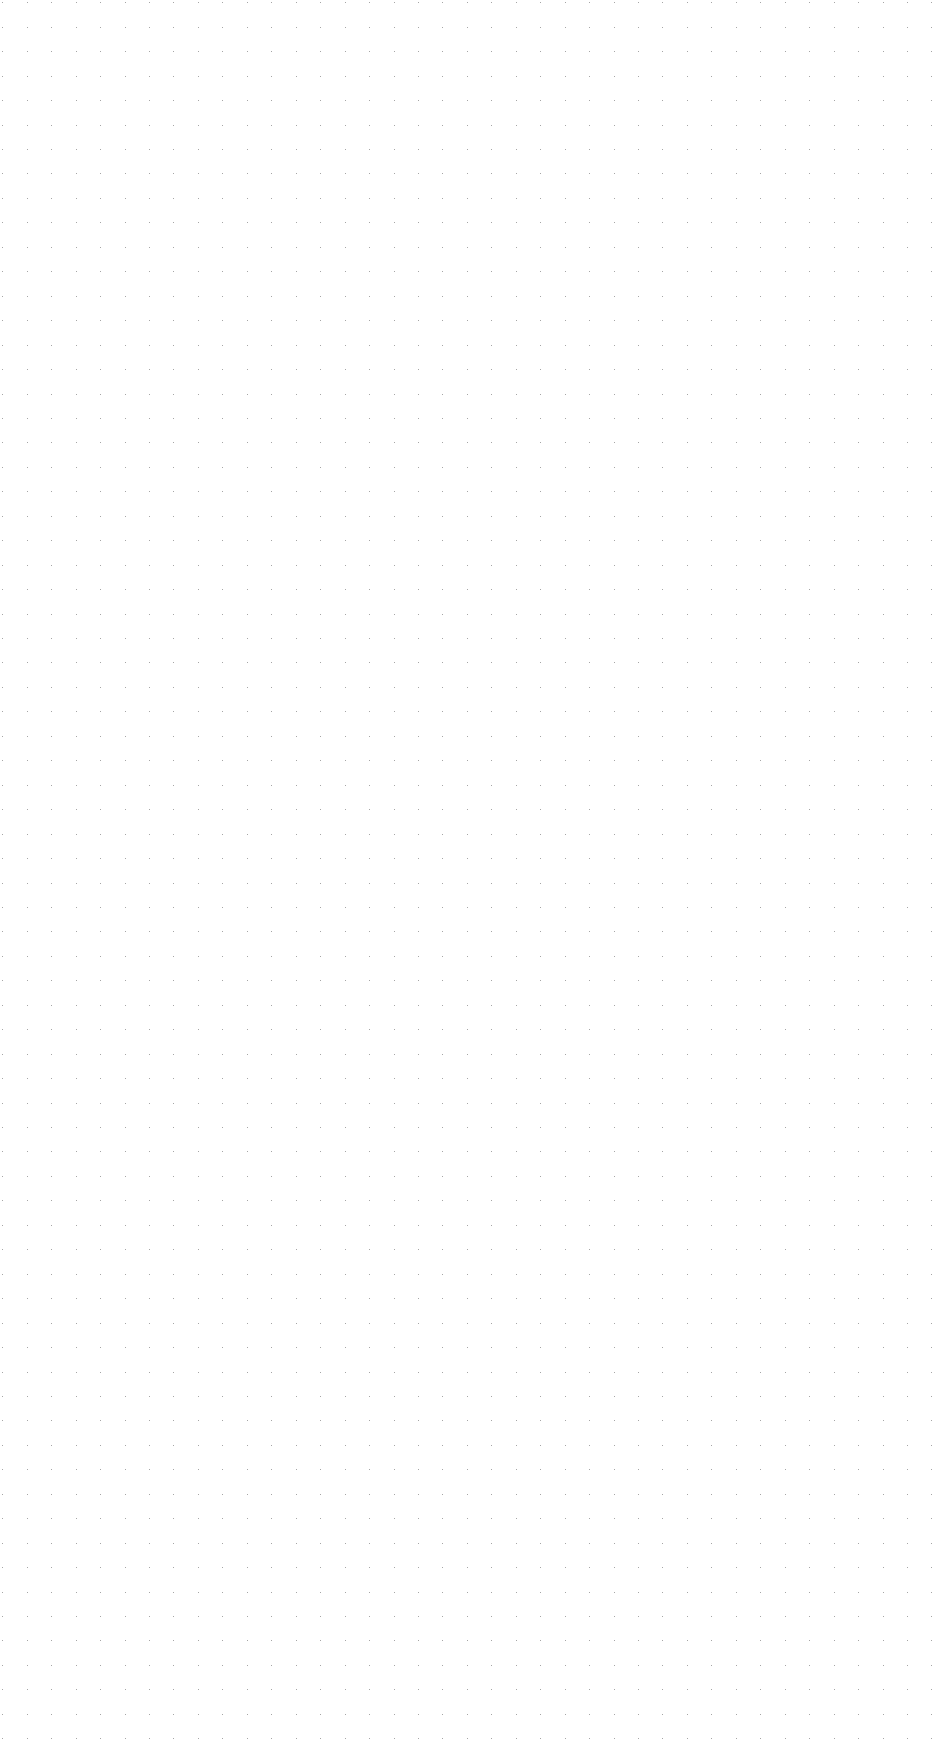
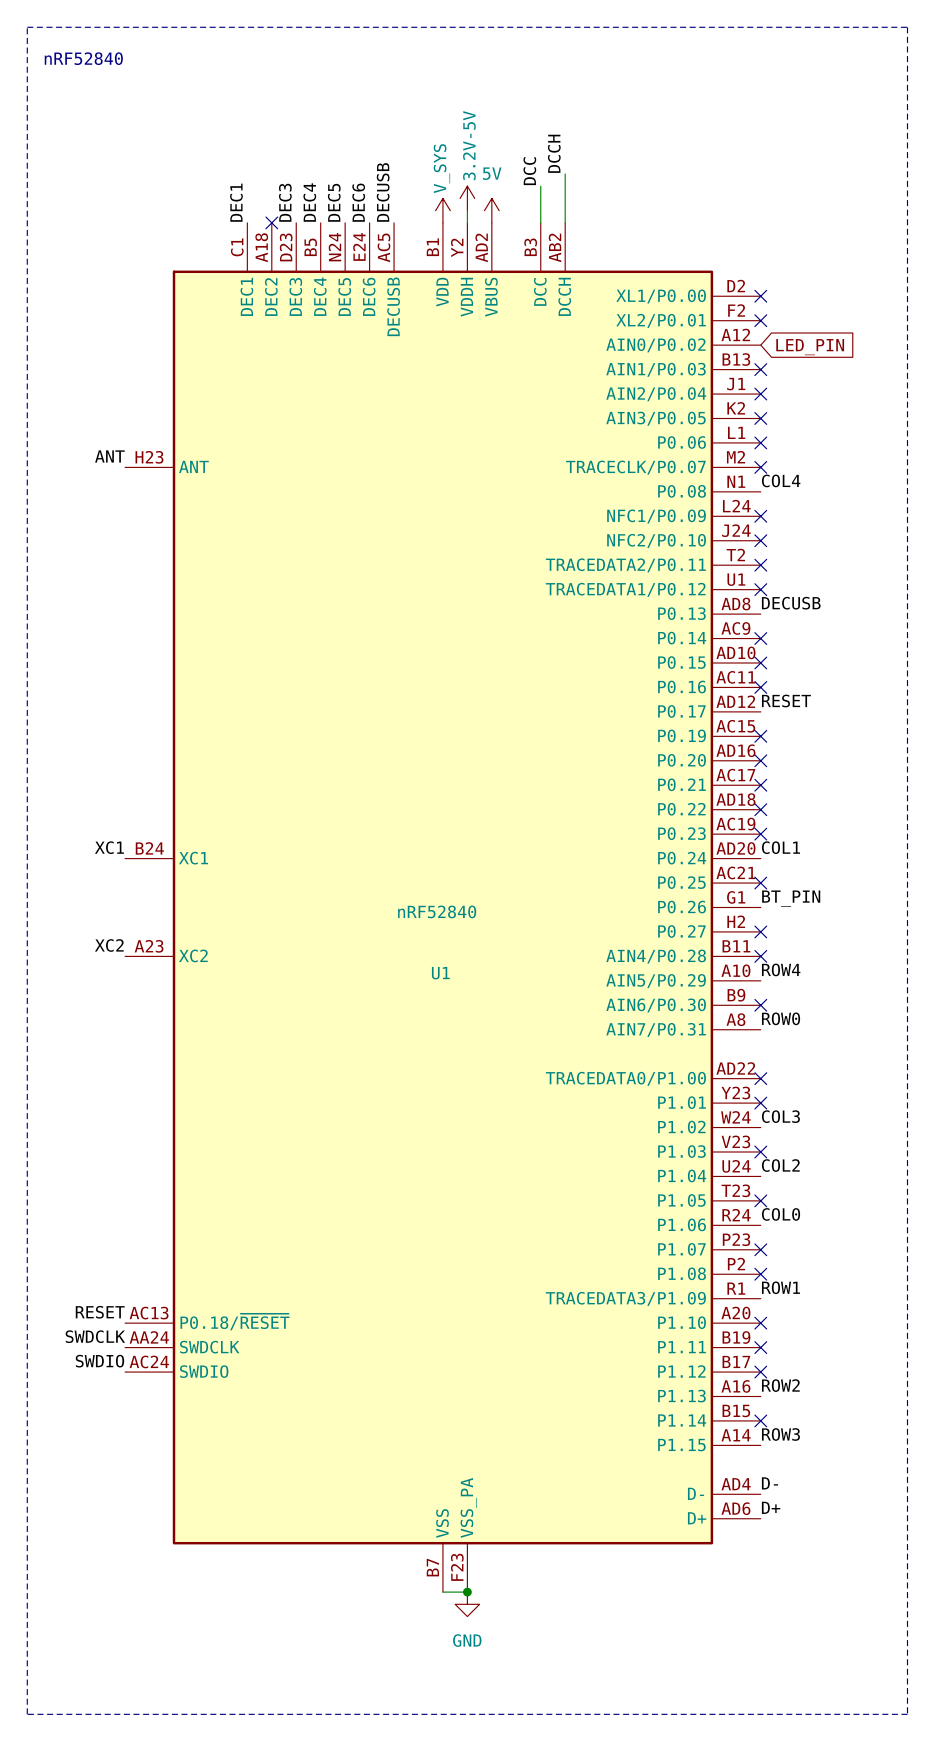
line: none -> (27, 27) (907, 27) (907, 1714) (27, 1714) (27, 27)
text: none -> nRF52840 (83, 58)
label: none -> DCCH (554, 153)
label: none -> DCC (529, 171)
wire: none -> (565, 173) (565, 222)
label: none -> DECUSB (383, 192)
wire: none -> (540, 186) (540, 222)
label: none -> DEC4 (309, 202)
label: none -> DEC1 (236, 202)
label: none -> DEC3 (285, 202)
label: none -> DEC5 (334, 202)
label: none -> DEC6 (358, 202)
power symbol: none -> 3.2V-5V (467, 198)
power symbol: none -> V_SYS (442, 210)
wire: none -> (467, 210) (467, 222)
power symbol: none -> 5V (491, 210)
no-connect mark: none -> (271, 222)
no-connect mark: none -> (760, 296)
no-connect mark: none -> (760, 320)
global label: none -> LED_PIN (810, 347)
no-connect mark: none -> (760, 369)
no-connect mark: none -> (760, 394)
no-connect mark: none -> (760, 418)
no-connect mark: none -> (760, 442)
label: none -> ANT (109, 456)
no-connect mark: none -> (760, 467)
label: none -> COL4 (781, 480)
no-connect mark: none -> (760, 516)
no-connect mark: none -> (760, 540)
no-connect mark: none -> (760, 565)
no-connect mark: none -> (760, 589)
label: none -> DECUSB (791, 603)
no-connect mark: none -> (760, 638)
no-connect mark: none -> (760, 662)
no-connect mark: none -> (760, 687)
label: none -> RESET (786, 700)
no-connect mark: none -> (760, 736)
no-connect mark: none -> (760, 760)
no-connect mark: none -> (760, 785)
no-connect mark: none -> (760, 809)
no-connect mark: none -> (760, 834)
label: none -> XC1 (109, 847)
label: none -> COL1 (780, 847)
no-connect mark: none -> (760, 883)
label: none -> BT_PIN (791, 898)
U1: none -> nRF52840 (442, 907)
no-connect mark: none -> (760, 931)
label: none -> XC2 (109, 945)
no-connect mark: none -> (760, 956)
label: none -> ROW4 (781, 969)
no-connect mark: none -> (760, 1005)
label: none -> ROW0 (781, 1018)
no-connect mark: none -> (760, 1078)
no-connect mark: none -> (760, 1103)
label: none -> COL3 (780, 1116)
no-connect mark: none -> (760, 1151)
label: none -> COL2 (780, 1165)
no-connect mark: none -> (760, 1200)
label: none -> COL0 (781, 1214)
no-connect mark: none -> (760, 1249)
no-connect mark: none -> (760, 1274)
label: none -> ROW1 (781, 1287)
label: none -> RESET (100, 1312)
no-connect mark: none -> (760, 1323)
label: none -> SWDCLK (95, 1336)
no-connect mark: none -> (760, 1347)
label: none -> SWDIO (99, 1361)
no-connect mark: none -> (760, 1372)
label: none -> ROW2 (780, 1385)
no-connect mark: none -> (760, 1420)
label: none -> ROW3 (780, 1434)
label: none -> D- (769, 1483)
label: none -> D+ (771, 1507)
wire: none -> (442, 1592) (467, 1592)
junction: none -> (467, 1592)
power symbol: none -> GND (467, 1604)

